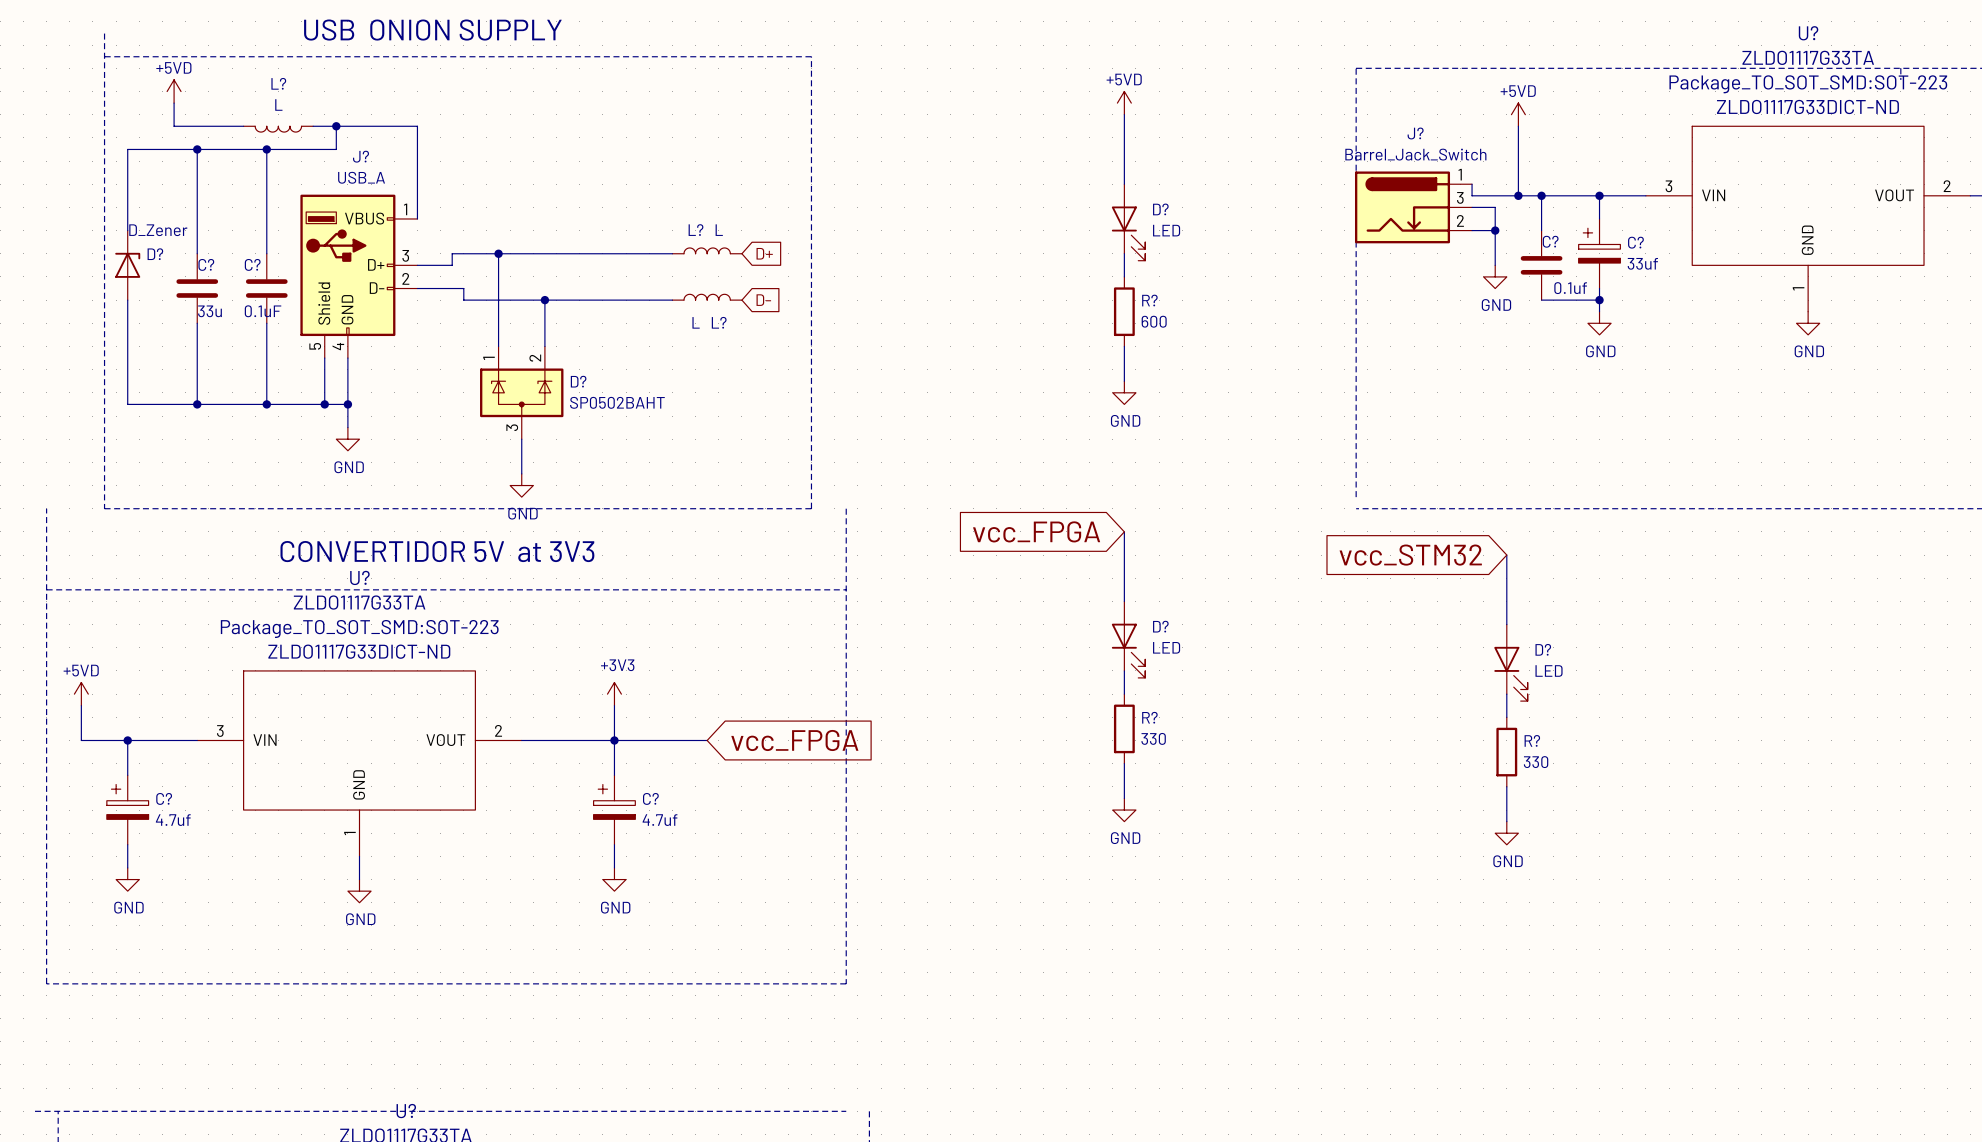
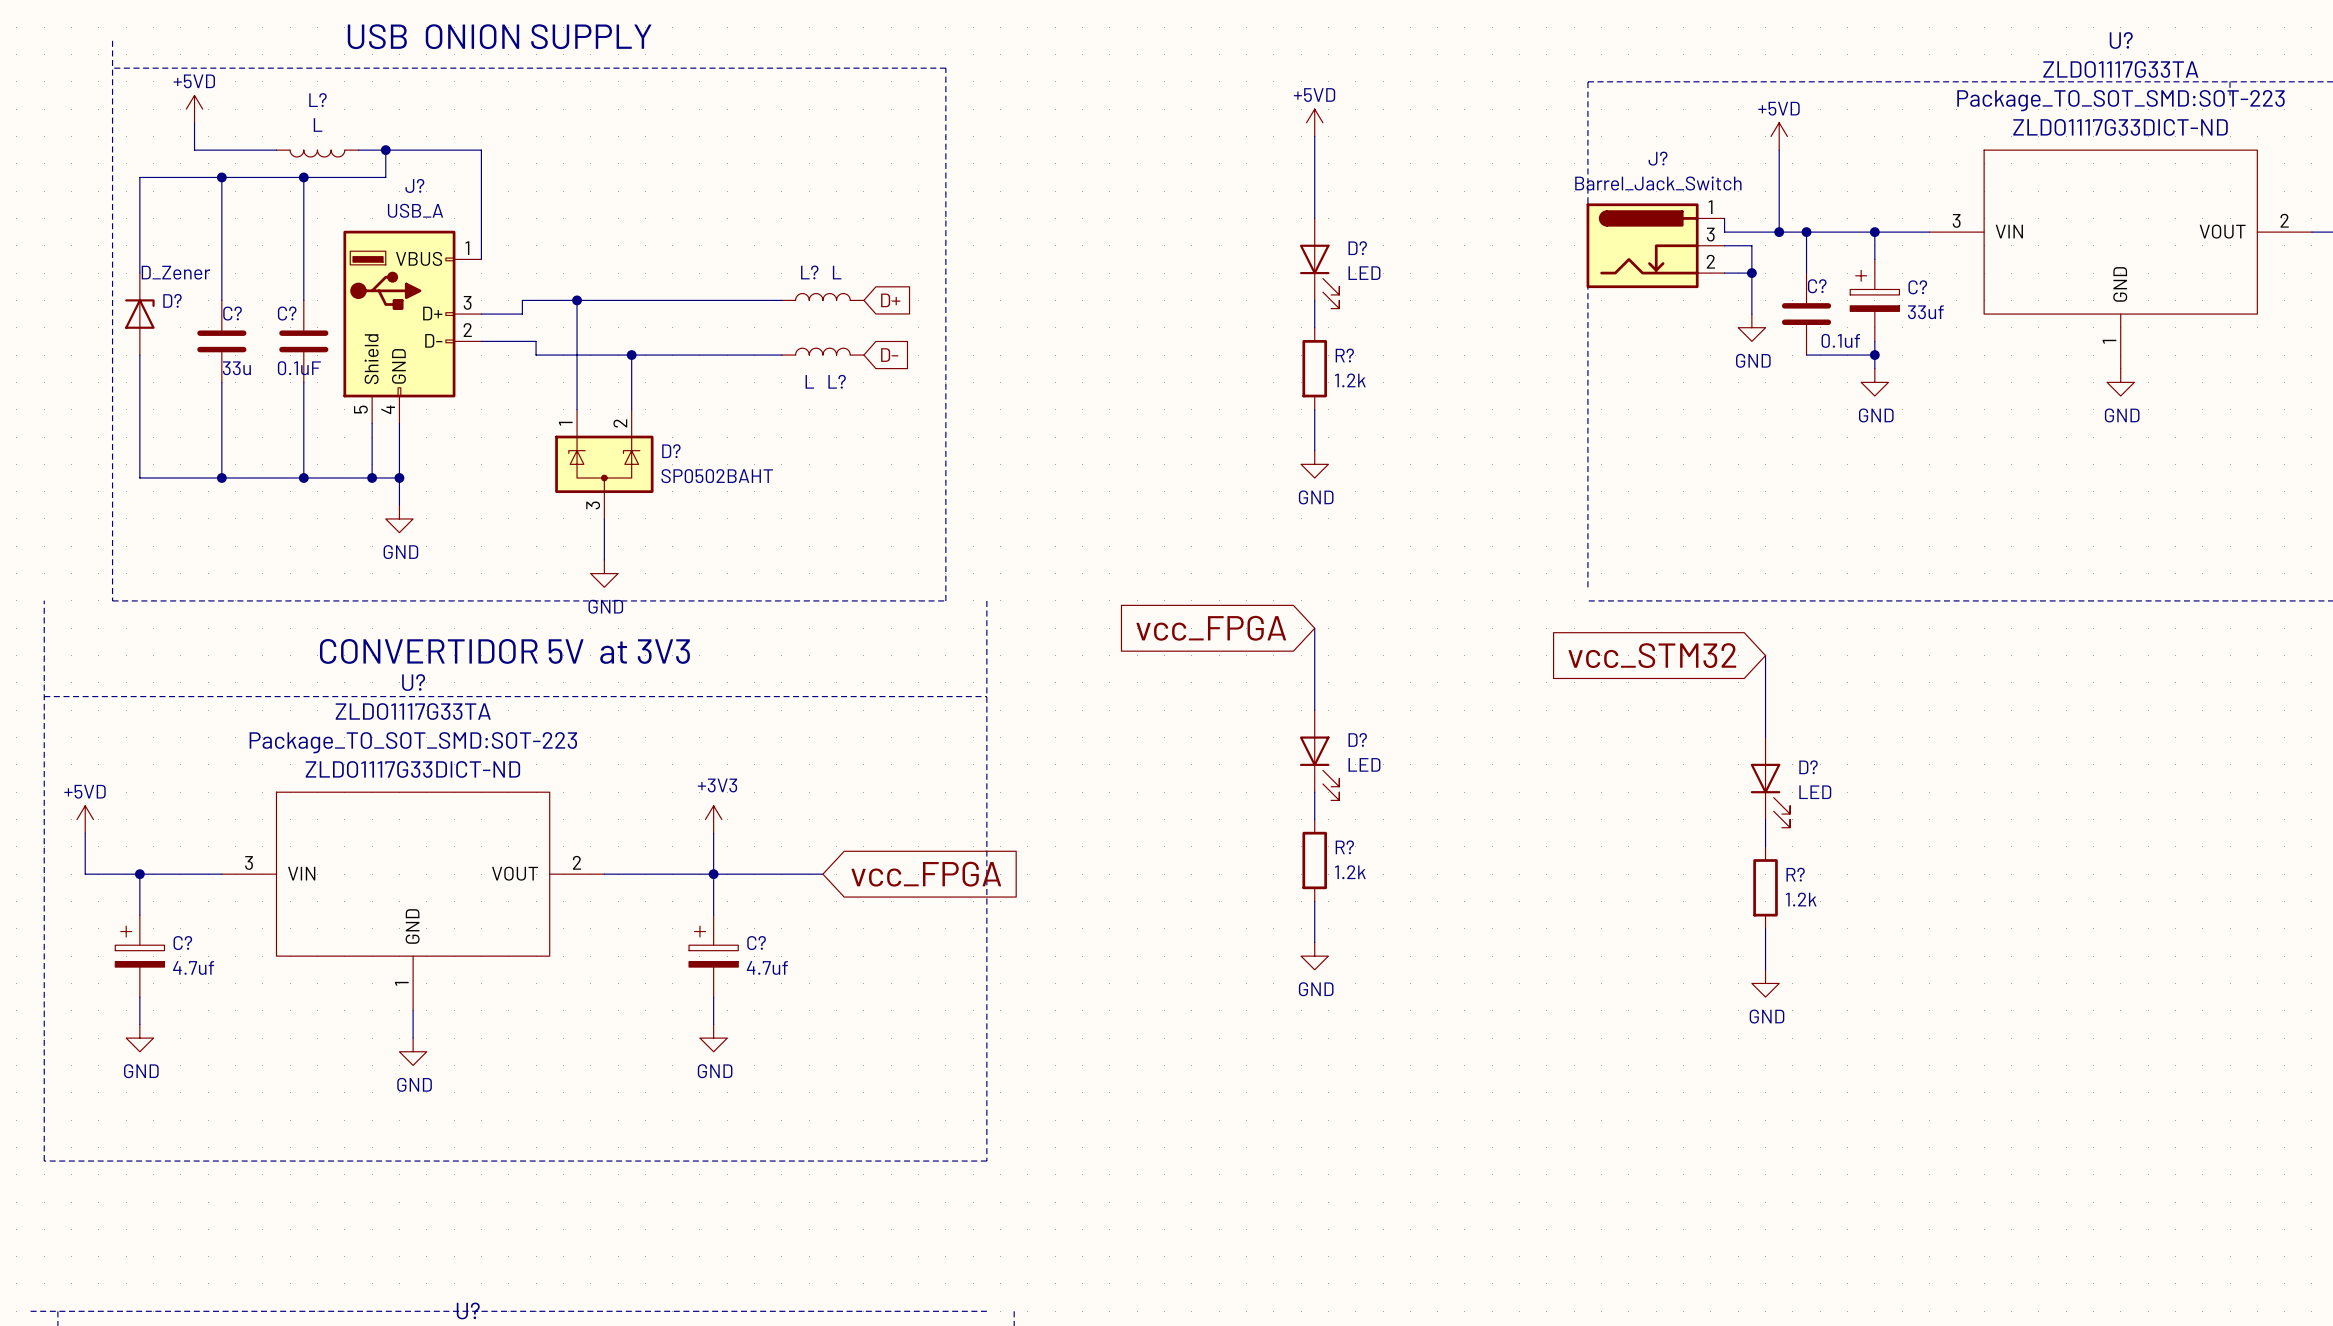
R? value: 600 (1154, 321) -> 1.2k (1350, 380)
R? value: 330 (1153, 738) -> 1.2k (1350, 872)
R? value: 330 (1536, 762) -> 1.2k (1801, 899)

